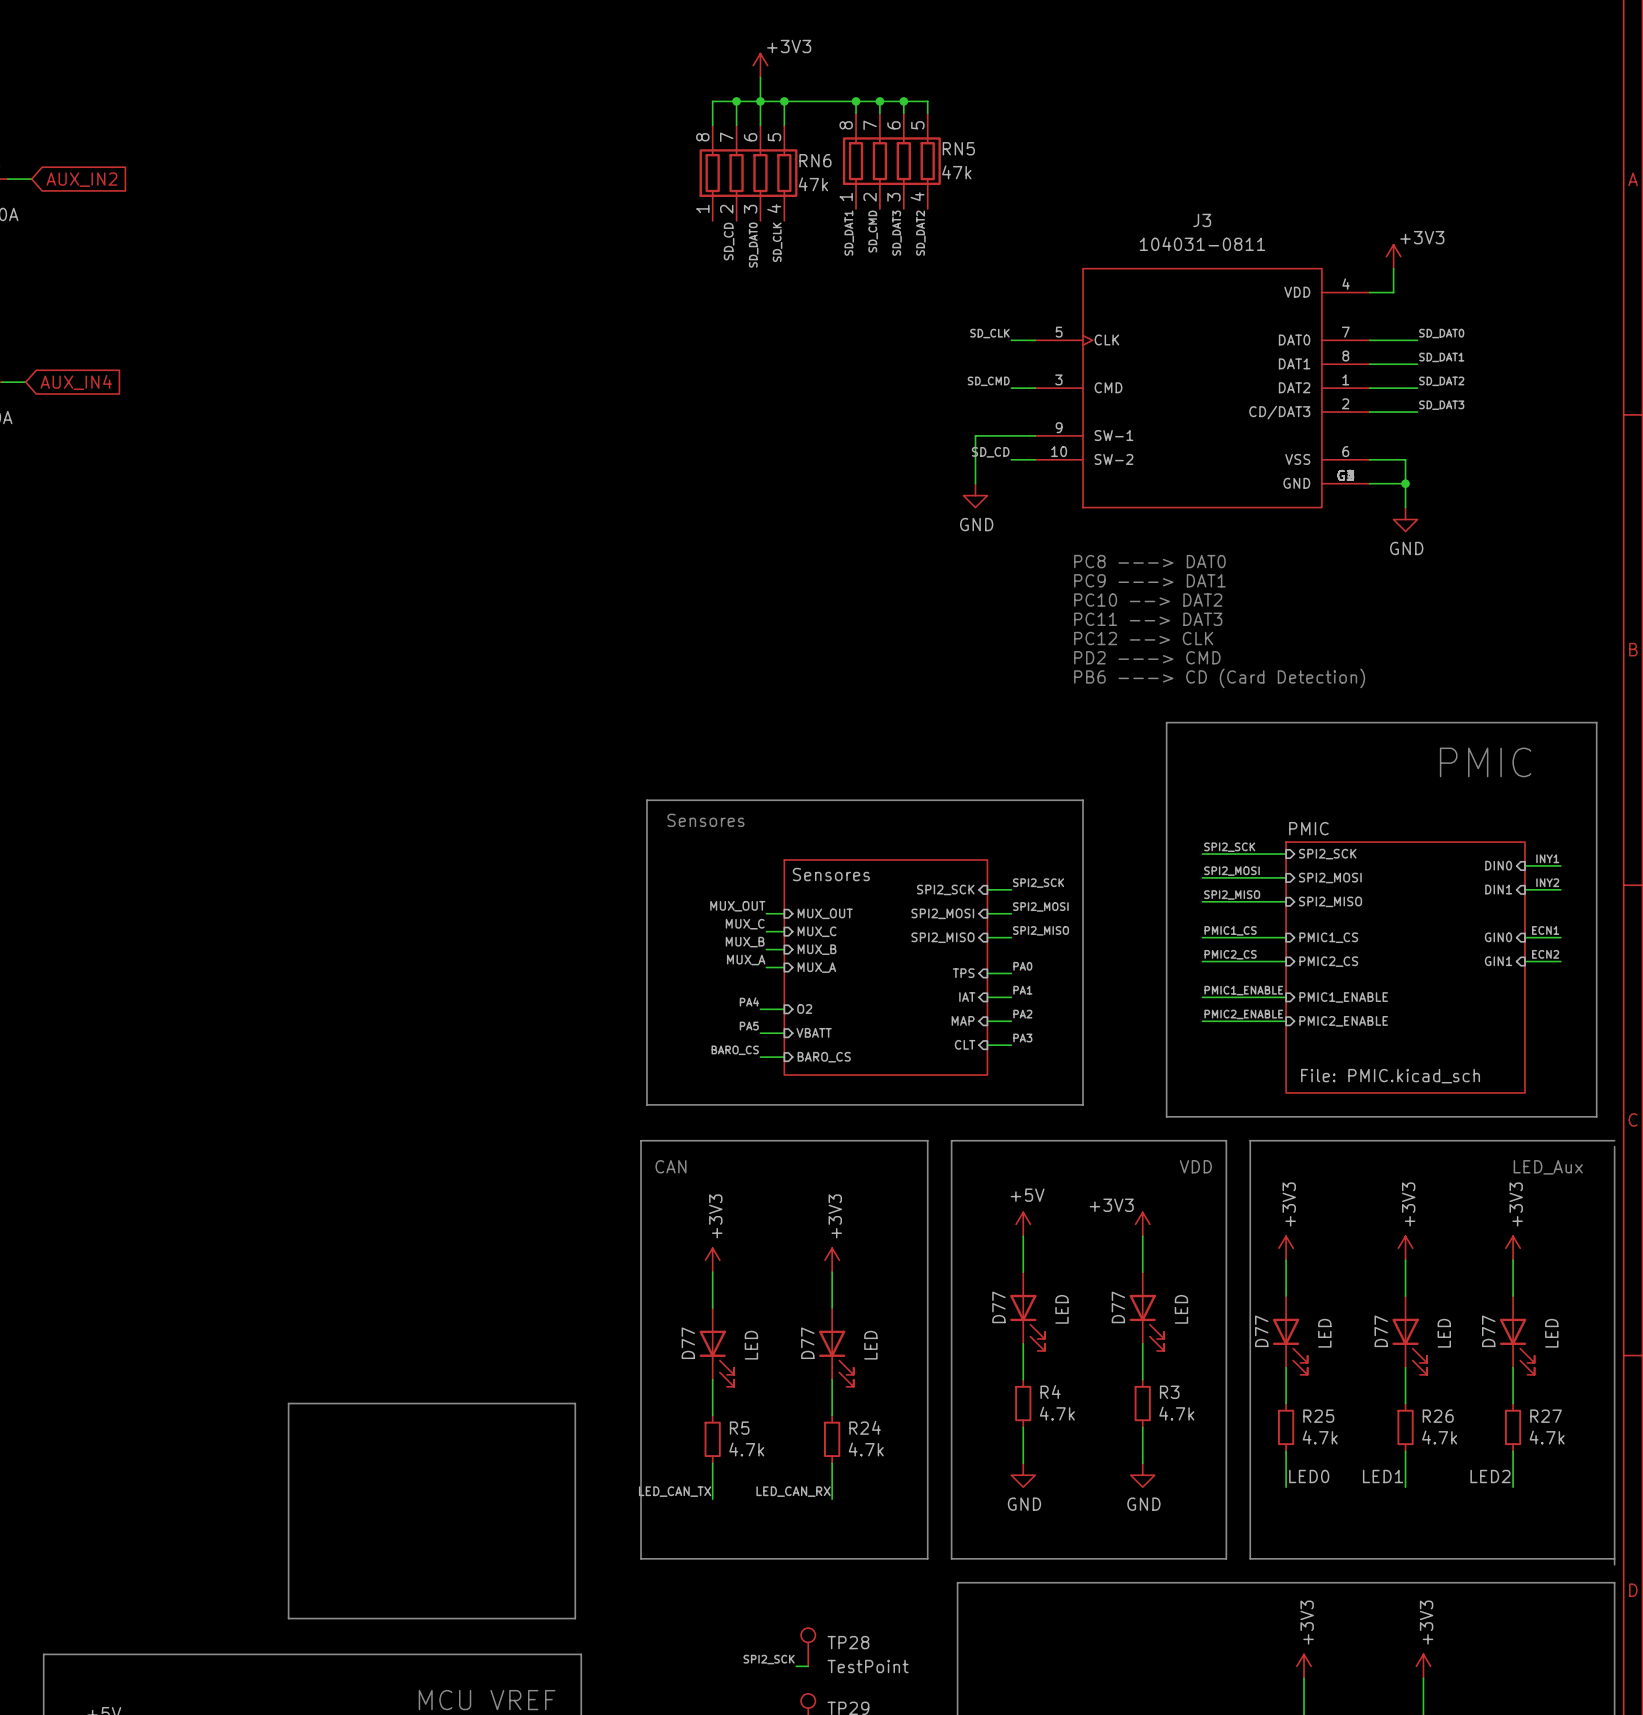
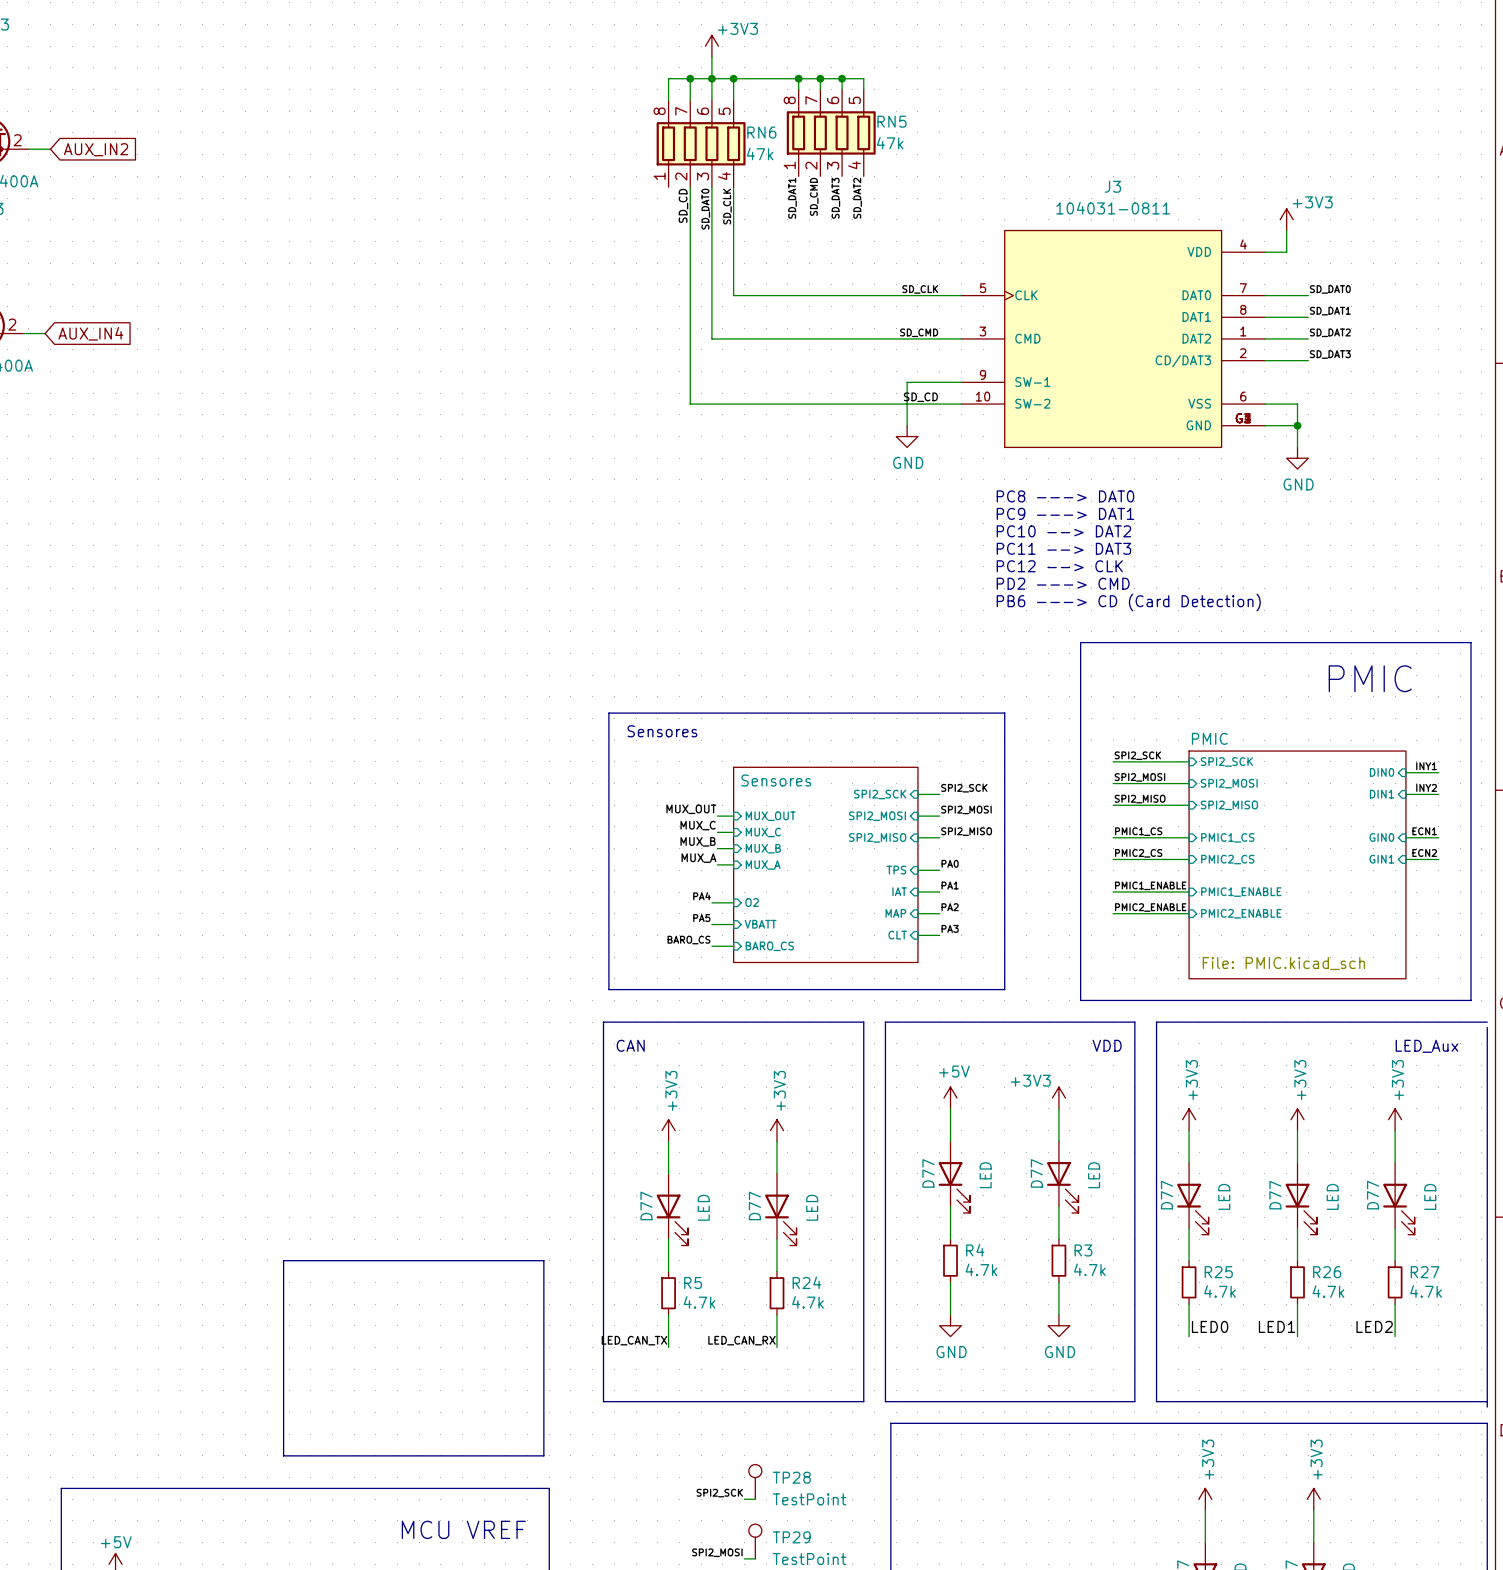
wire: none -> (690, 187) (690, 404) (939, 404)
wire: none -> (711, 187) (711, 338) (939, 338)
wire: none -> (733, 187) (733, 295) (939, 295)

